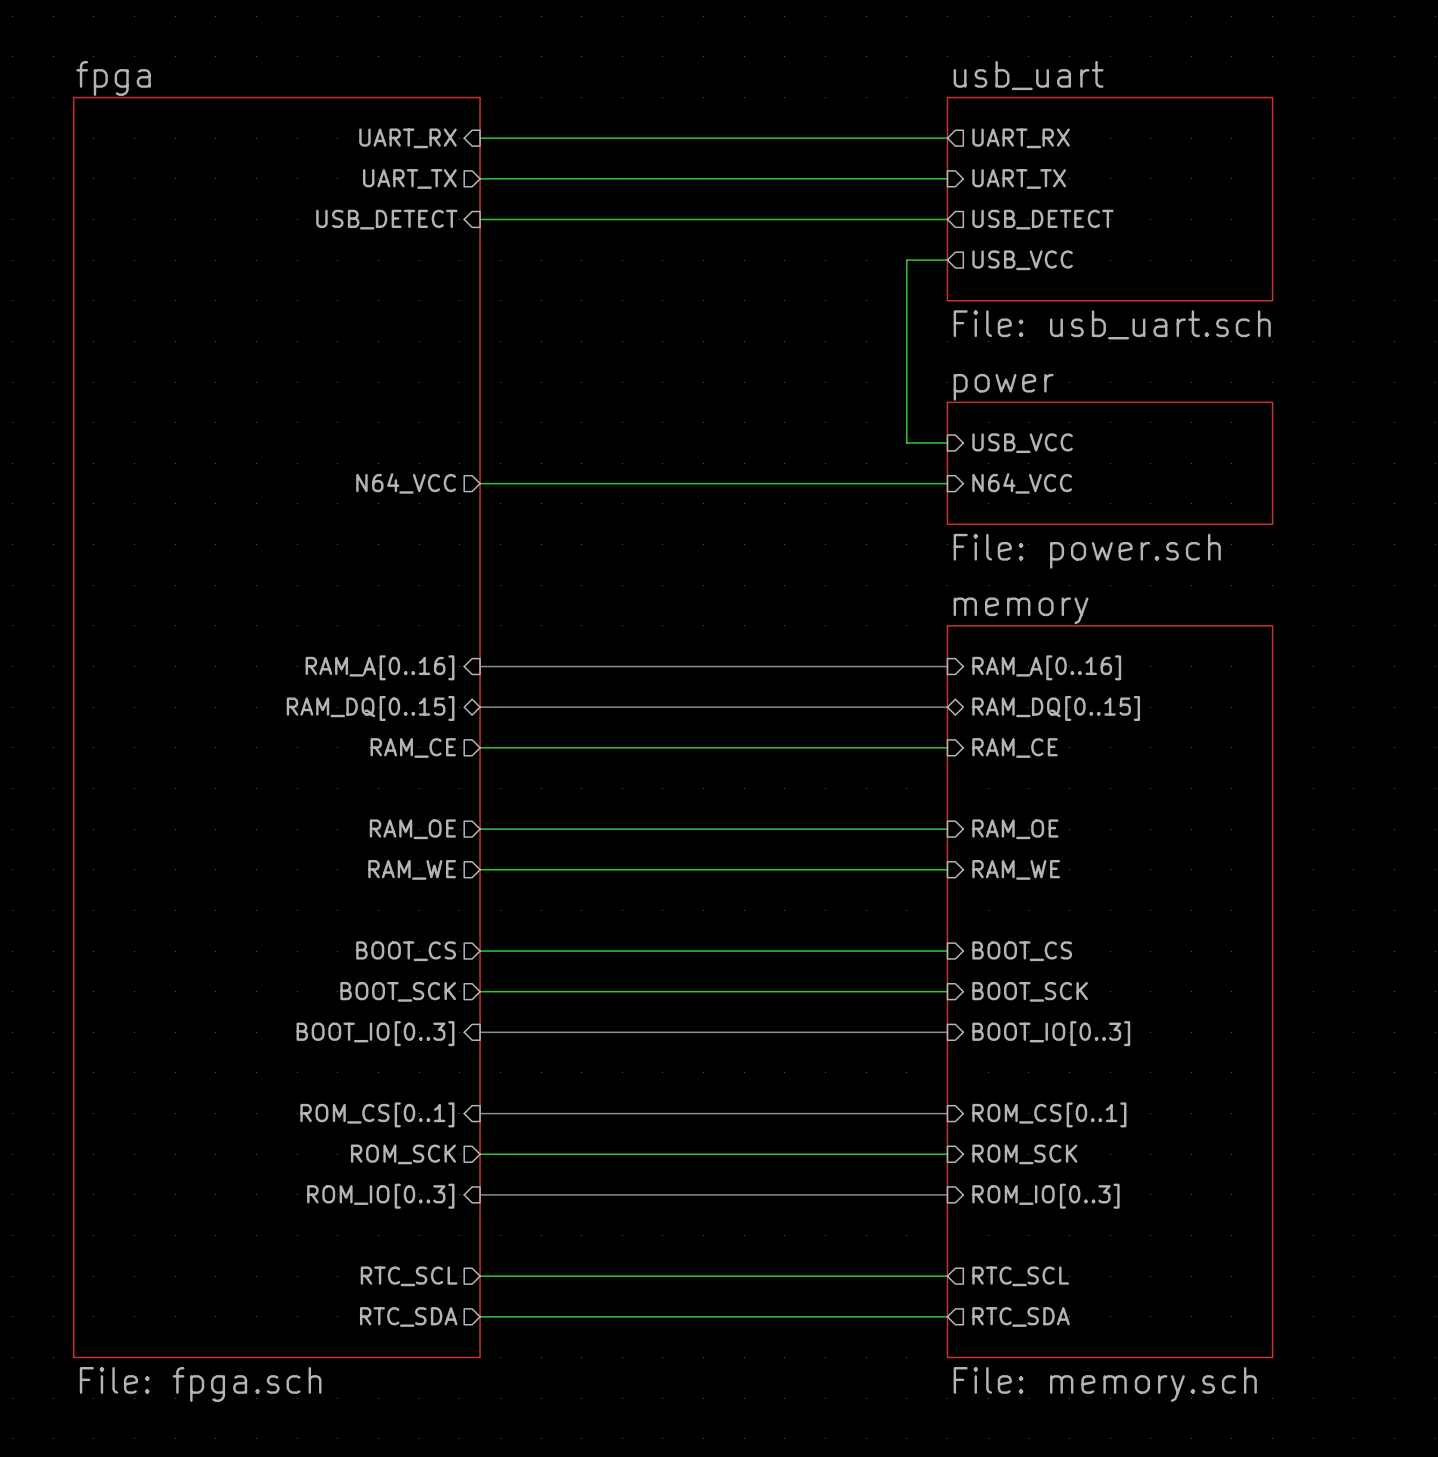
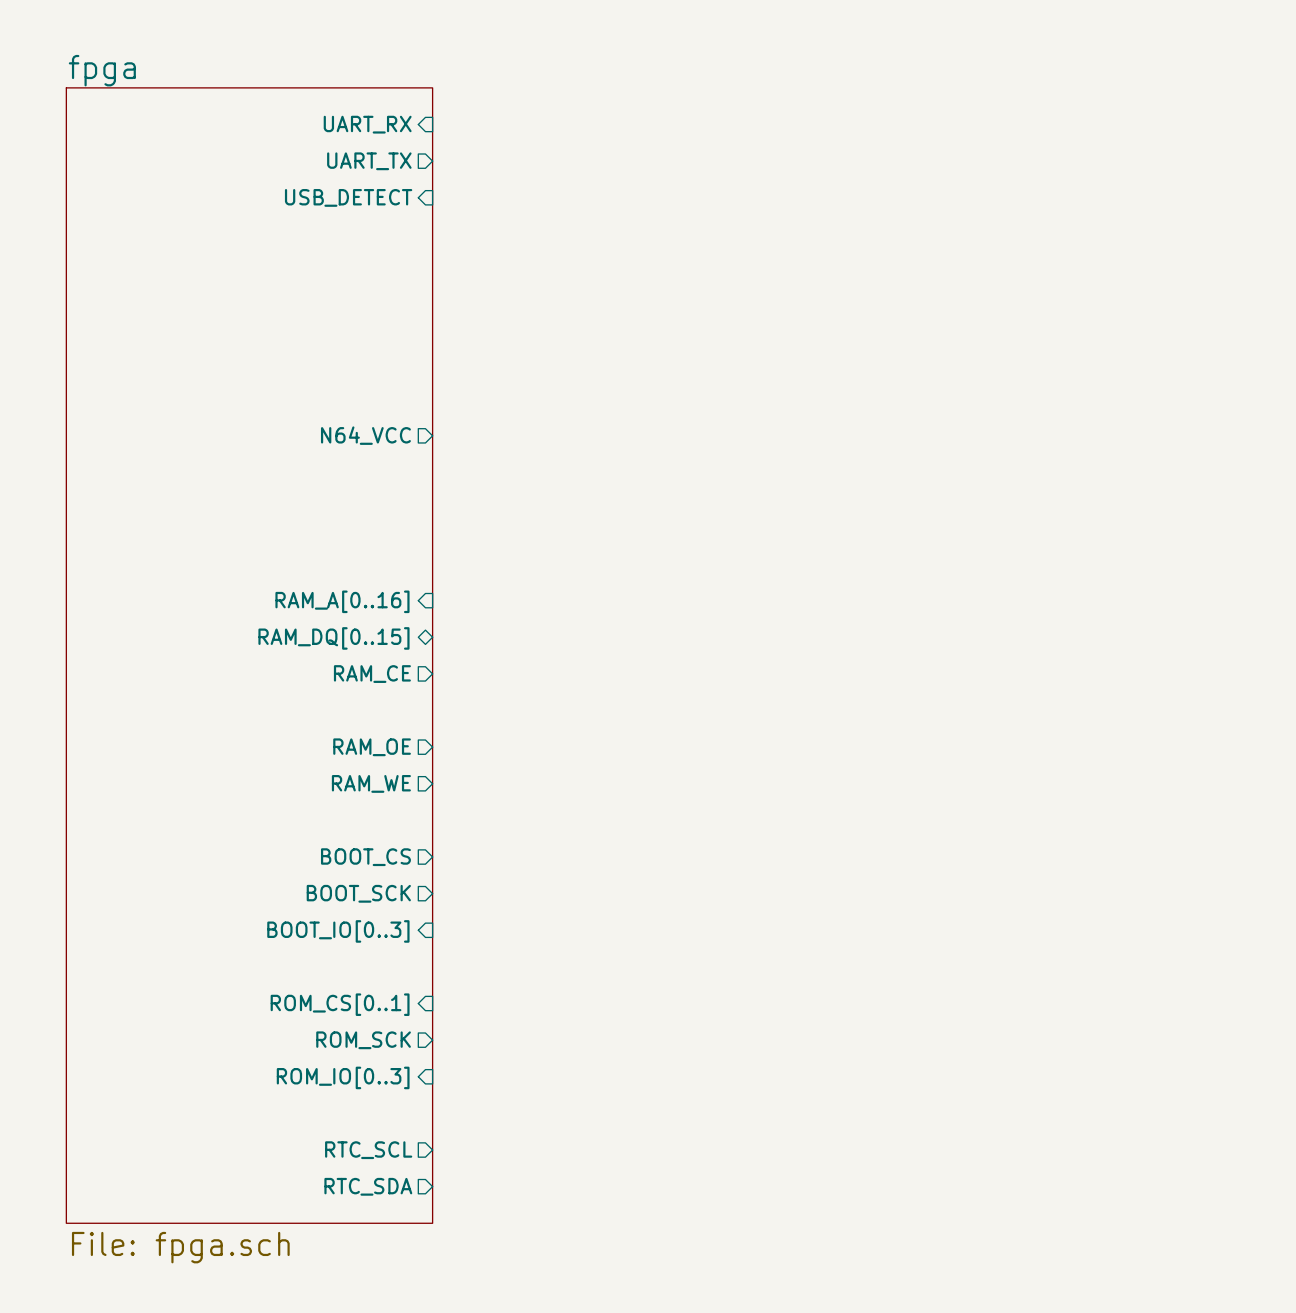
wire: (480, 138) (947, 138) -> none
sheet pin: UART_RX (1021, 138) -> none
wire: (480, 178) (947, 178) -> none
sheet pin: UART_TX (1019, 178) -> none
sheet usb_uart: File: usb_uart.sch (1110, 199) -> none
wire: (480, 219) (947, 219) -> none
sheet pin: USB_DETECT (1042, 219) -> none
wire: (947, 260) (906, 260) (906, 443) (947, 443) -> none
sheet pin: USB_VCC (1022, 260) -> none
sheet pin: USB_VCC (1022, 443) -> none
sheet power: File: power.sch (1110, 463) -> none
wire: (480, 483) (947, 483) -> none
sheet pin: N64_VCC (1022, 483) -> none
bus: (480, 666) (947, 666) -> none
sheet pin: RAM_A[0..16] (1046, 667) -> none
bus: (480, 707) (947, 707) -> none
sheet pin: RAM_DQ[0..15] (1056, 708) -> none
wire: (480, 747) (947, 747) -> none
sheet pin: RAM_CE (1015, 747) -> none
wire: (480, 829) (947, 829) -> none
sheet pin: RAM_OE (1015, 829) -> none
wire: (480, 869) (947, 869) -> none
sheet pin: RAM_WE (1016, 869) -> none
wire: (480, 951) (947, 951) -> none
sheet pin: BOOT_CS (1022, 951) -> none
wire: (480, 991) (947, 991) -> none
sheet pin: BOOT_SCK (1030, 991) -> none
sheet memory: File: memory.sch (1110, 991) -> none
bus: (480, 1032) (947, 1032) -> none
sheet pin: BOOT_IO[0..3] (1051, 1033) -> none
bus: (480, 1113) (947, 1113) -> none
sheet pin: ROM_CS[0..1] (1049, 1114) -> none
wire: (480, 1154) (947, 1154) -> none
sheet pin: ROM_SCK (1024, 1154) -> none
bus: (480, 1194) (947, 1194) -> none
sheet pin: ROM_IO[0..3] (1045, 1196) -> none
wire: (480, 1276) (947, 1276) -> none
sheet pin: RTC_SCL (1020, 1276) -> none
wire: (480, 1316) (947, 1316) -> none
sheet pin: RTC_SDA (1021, 1316) -> none

